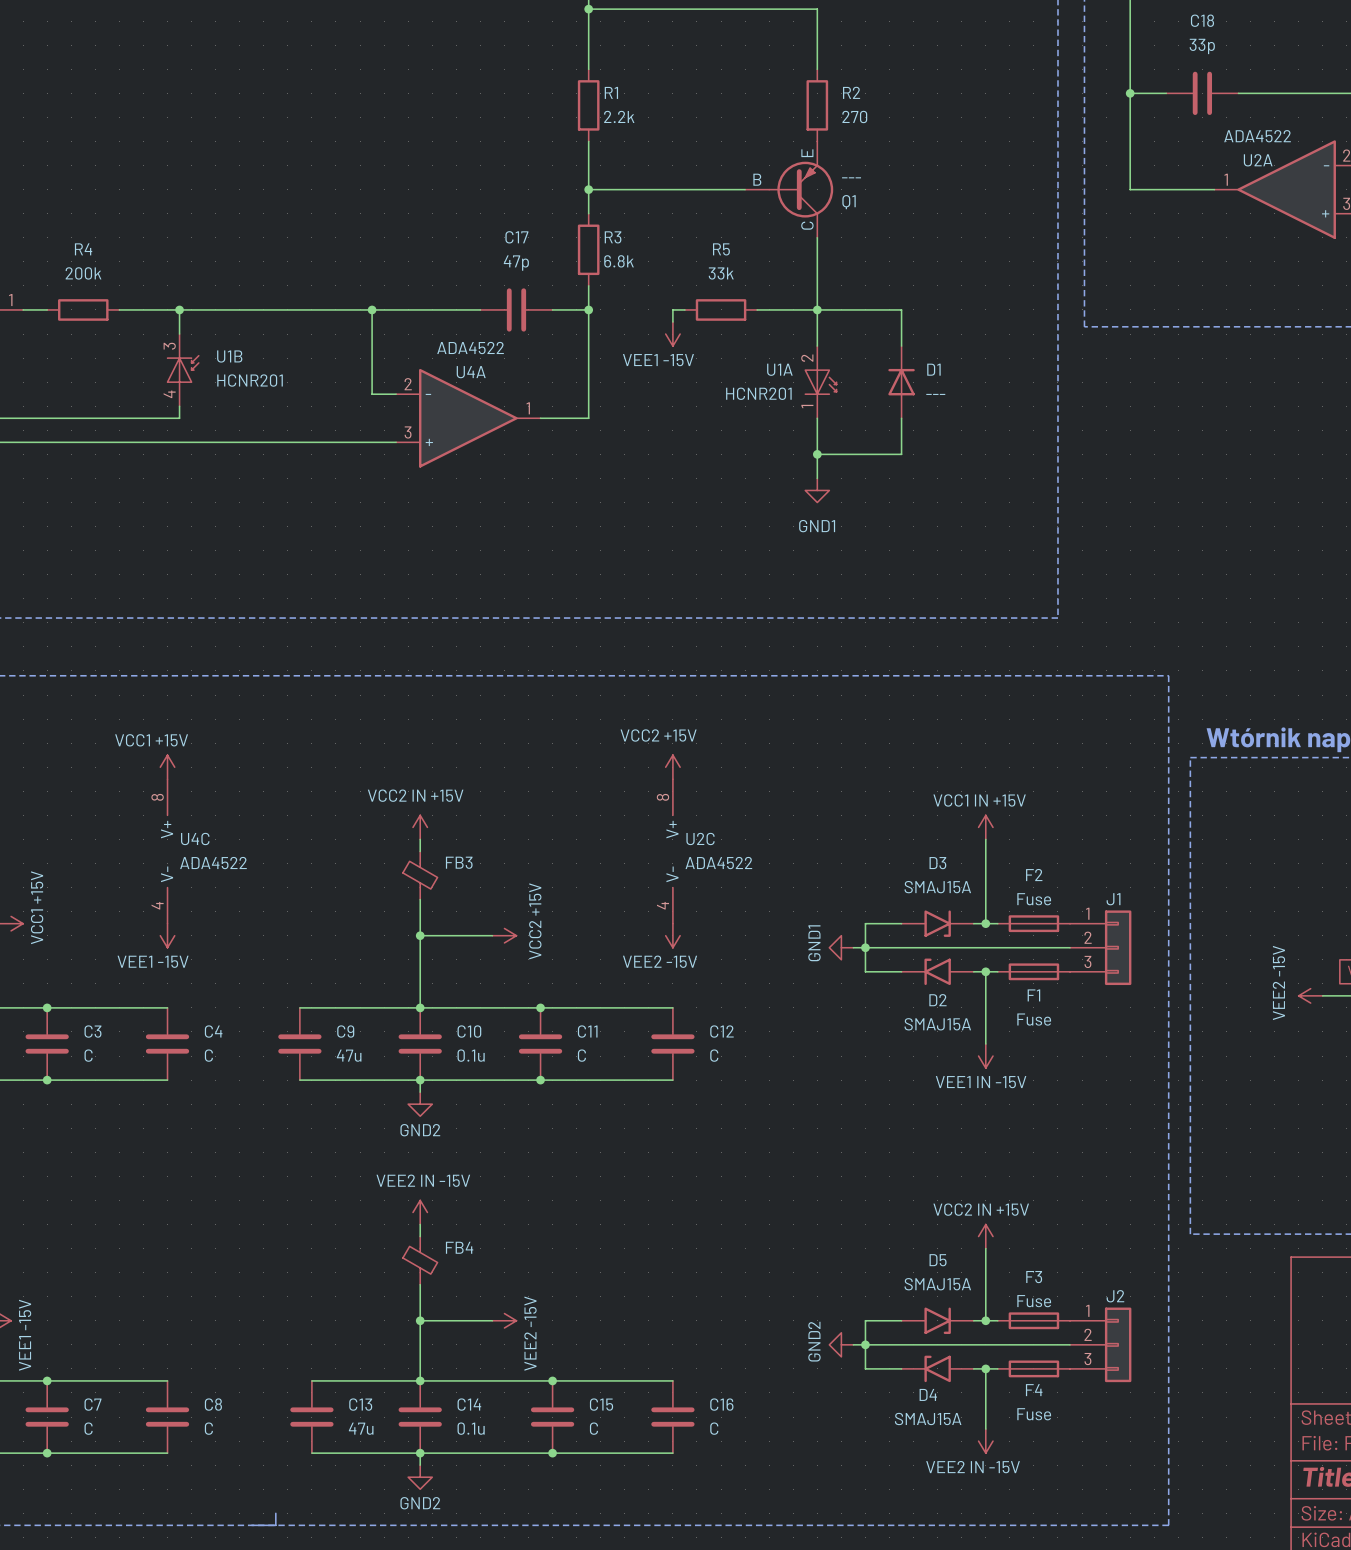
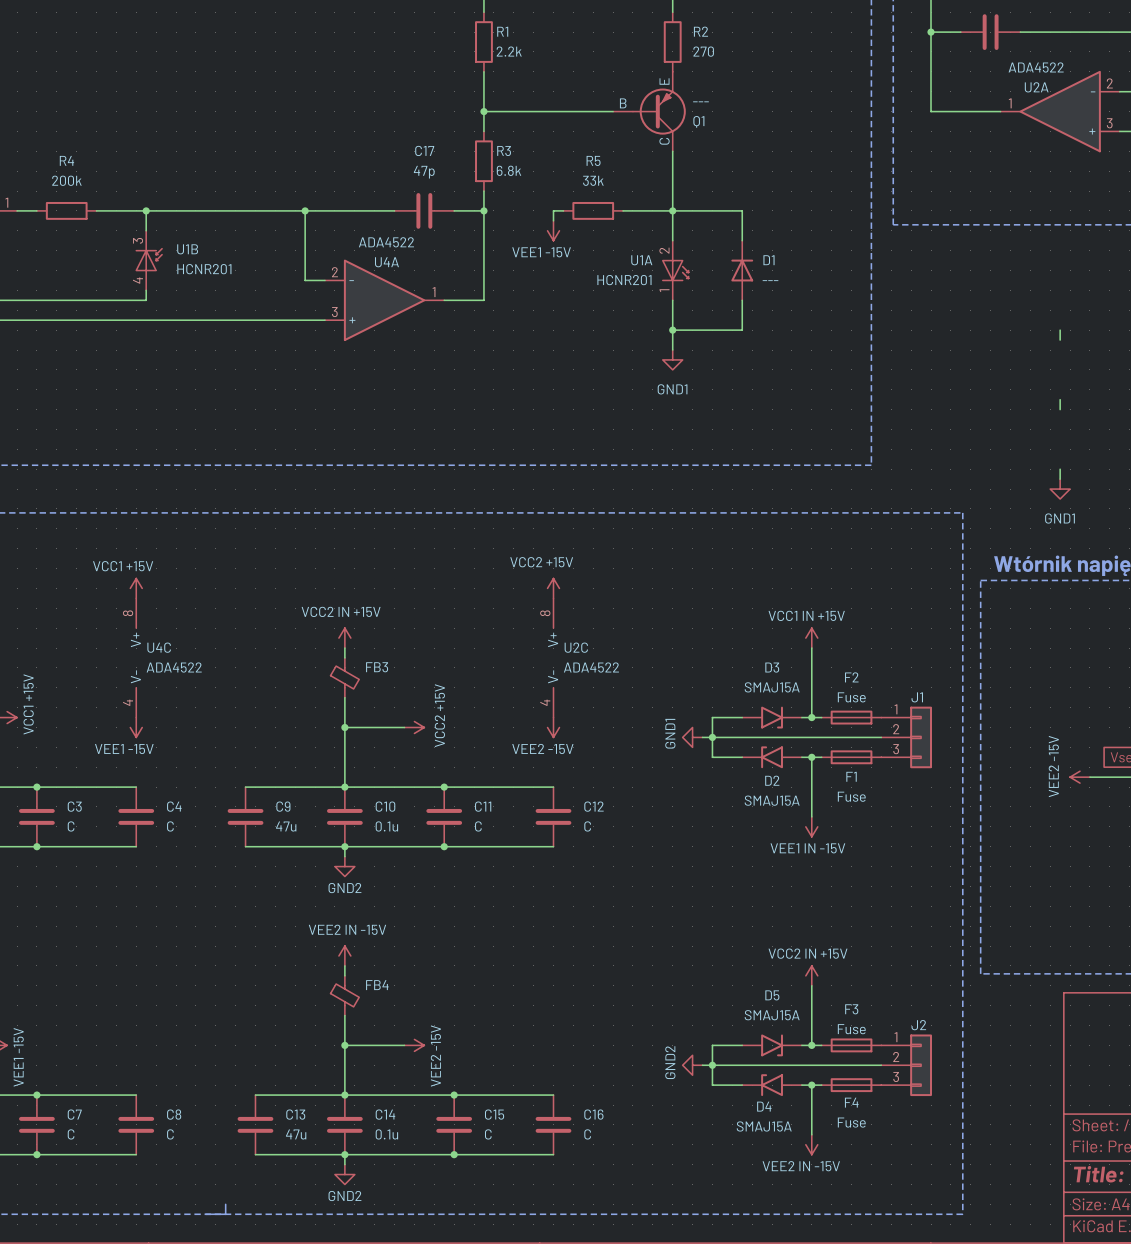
wire: none -> (1060, 330) (1060, 340)
wire: none -> (1060, 399) (1060, 409)
wire: none -> (1060, 469) (1060, 479)
power symbol: none -> GND1 (1060, 489)

